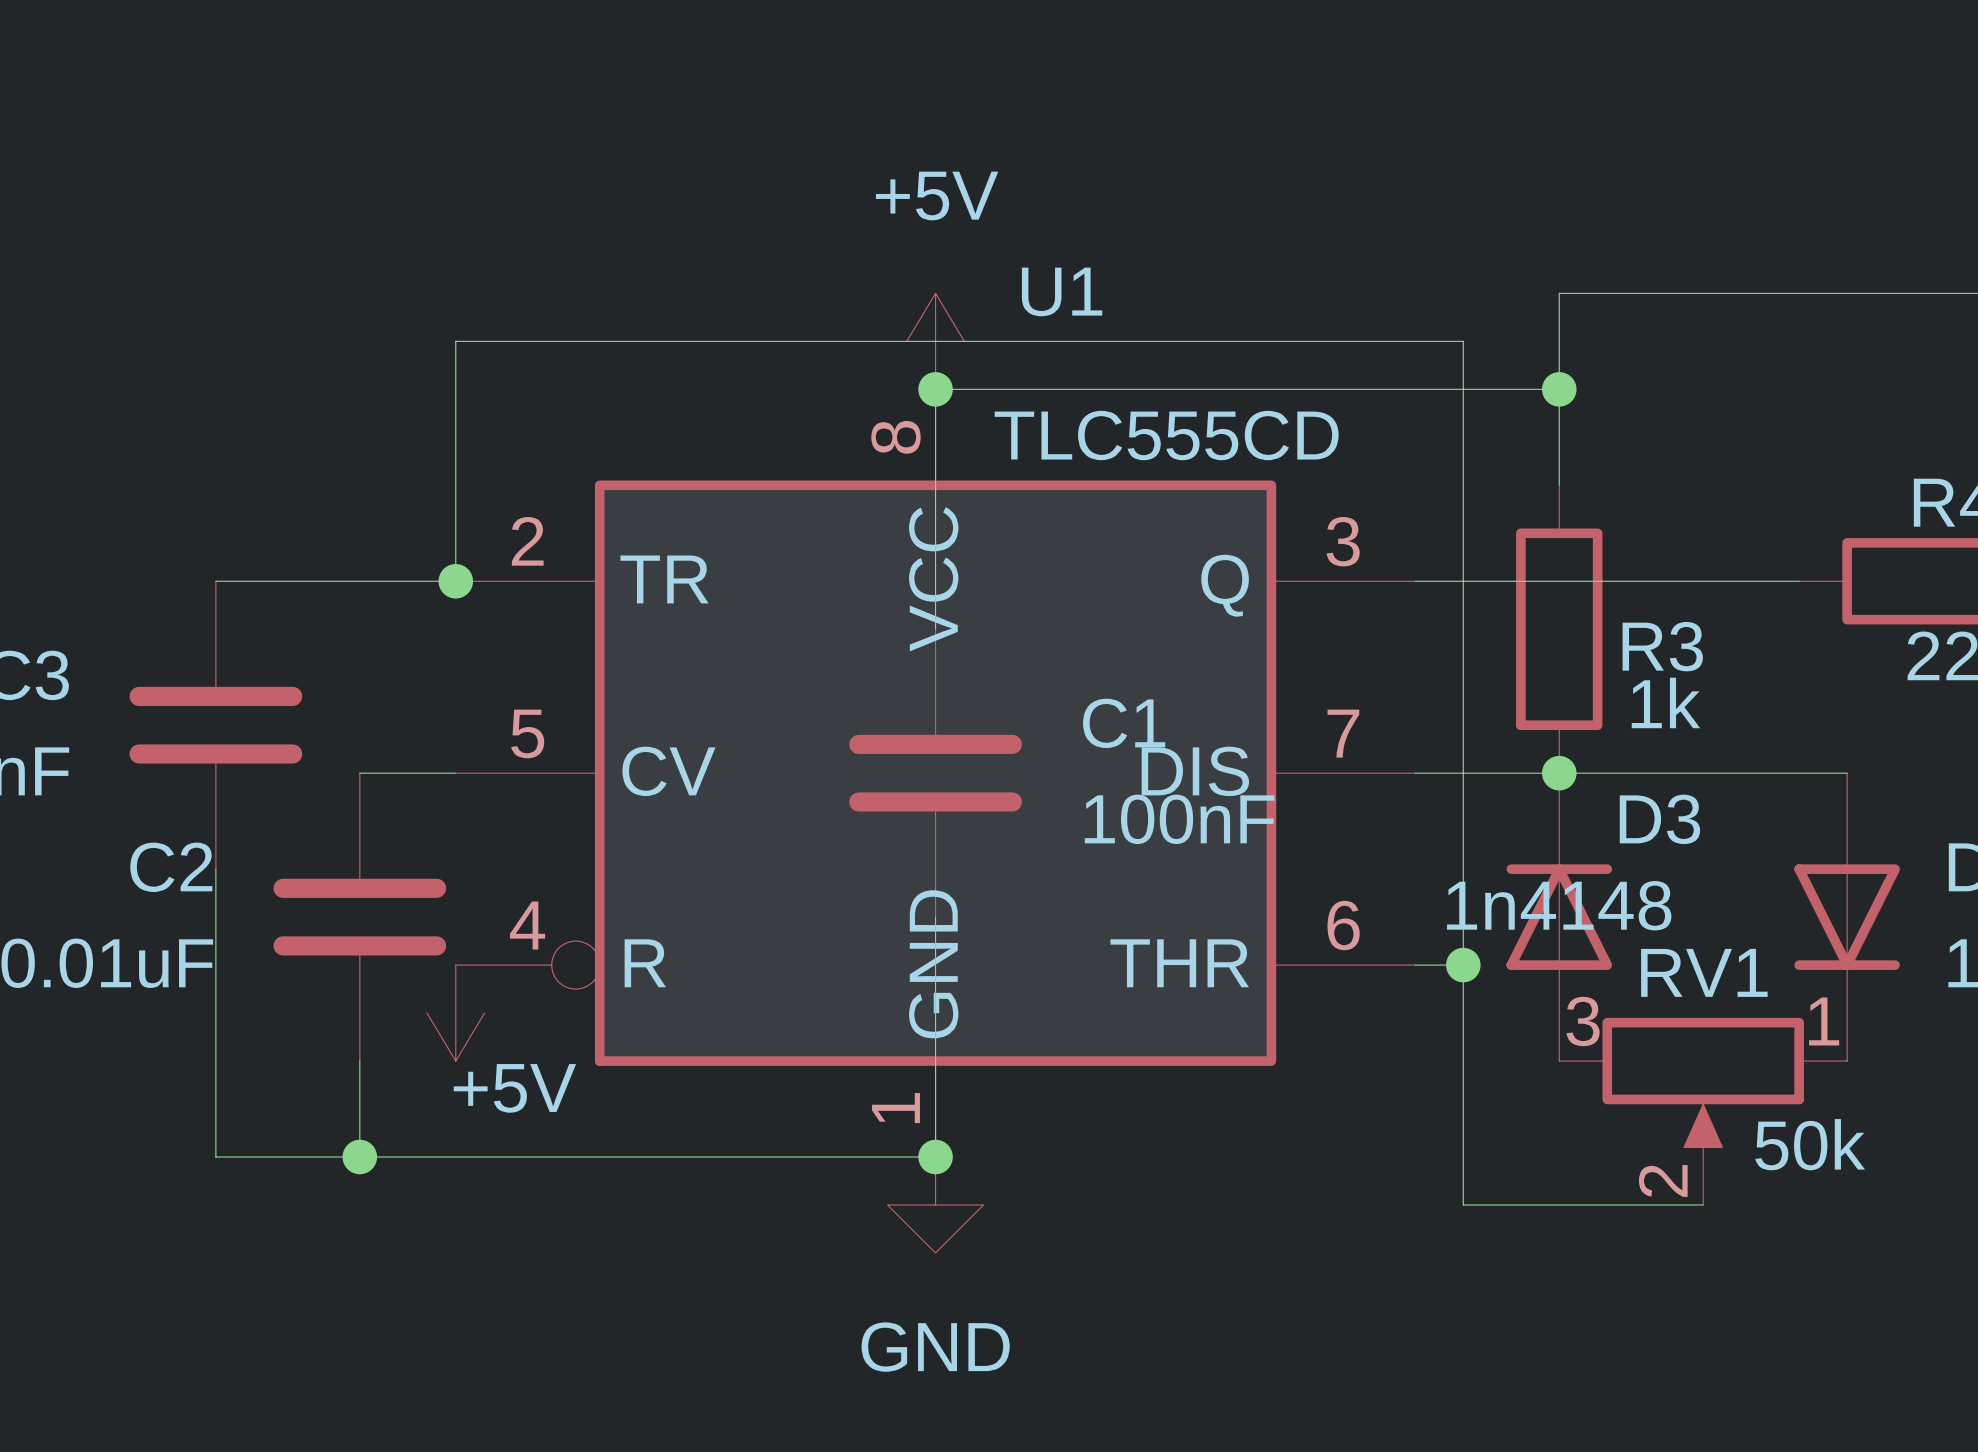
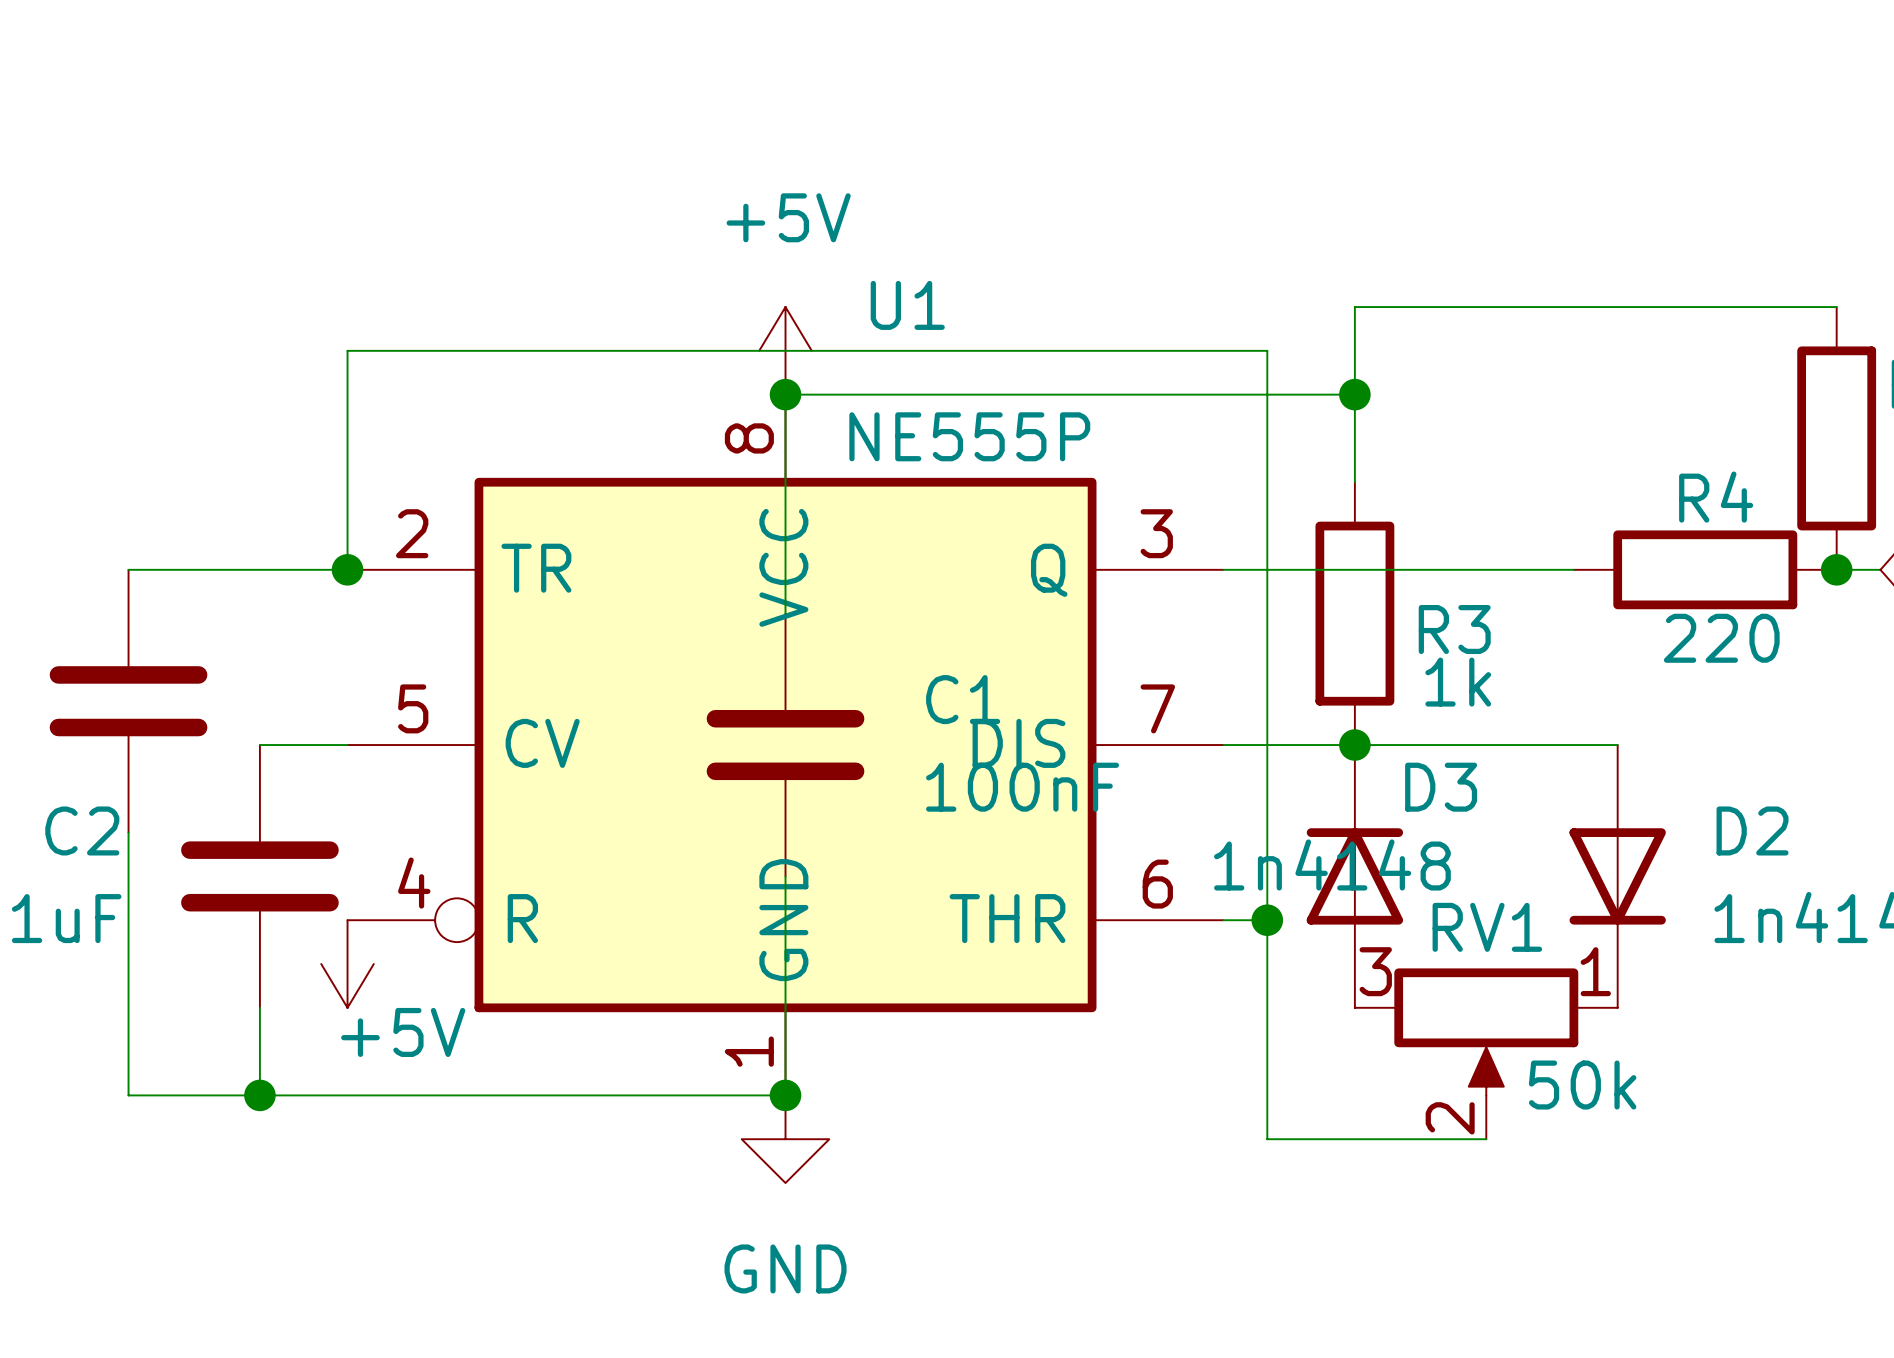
U1 value: TLC555CD (1166, 435) -> NE555P (969, 436)

